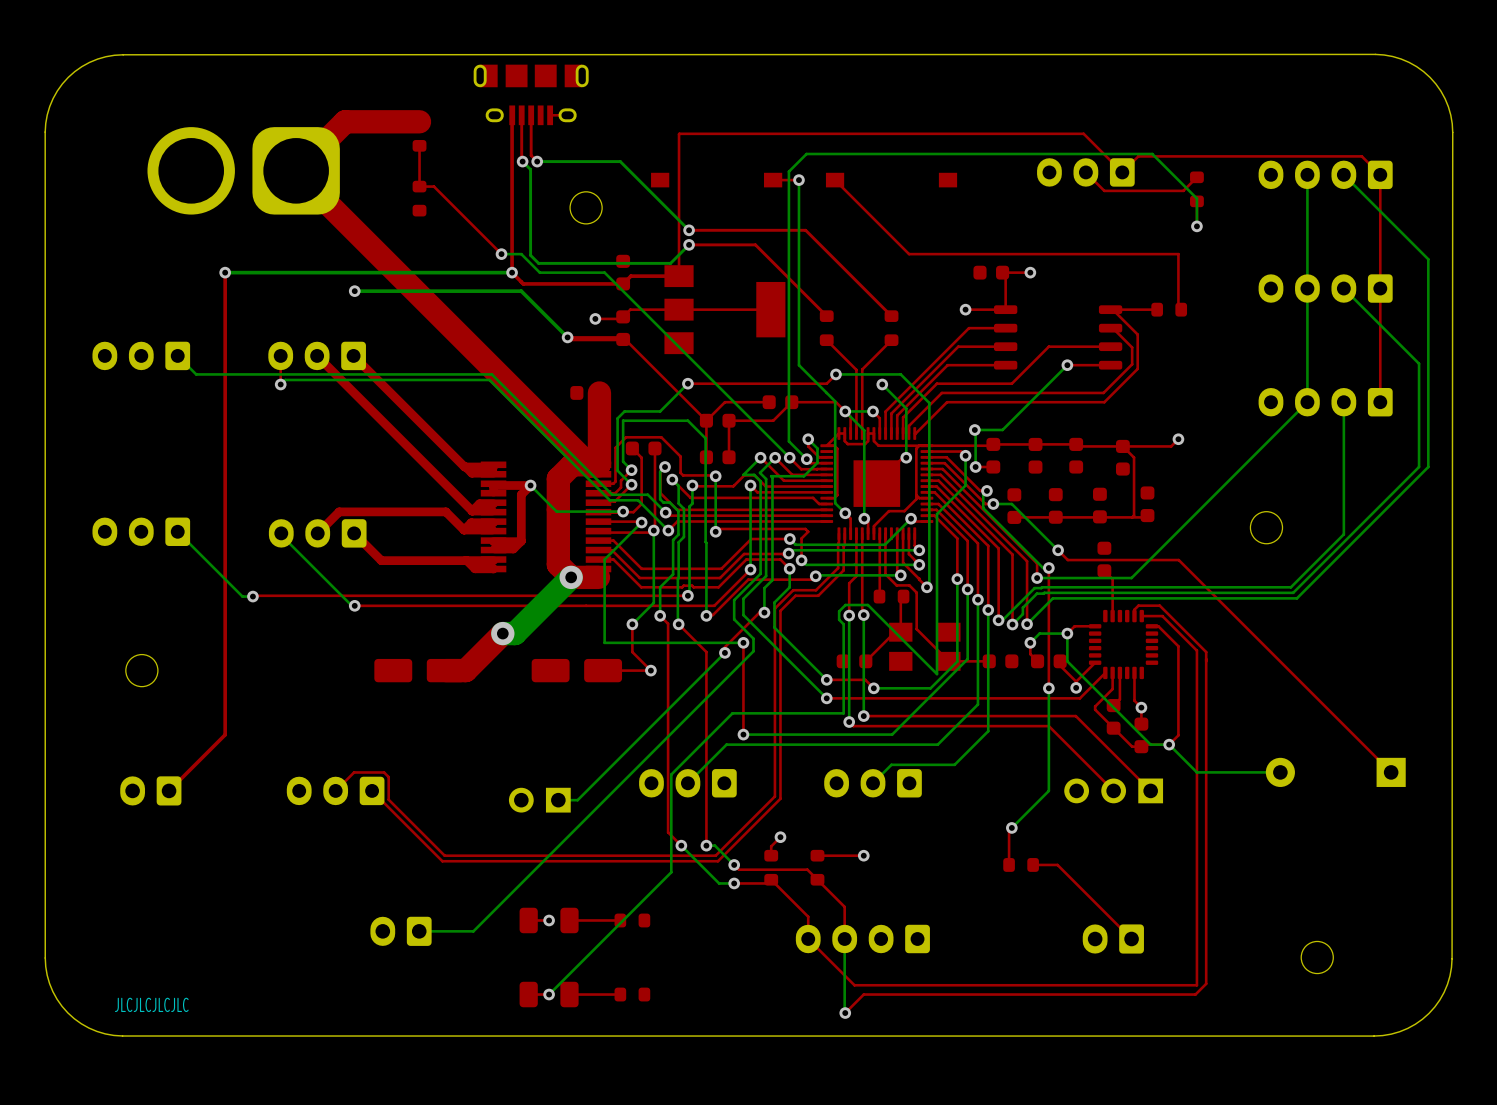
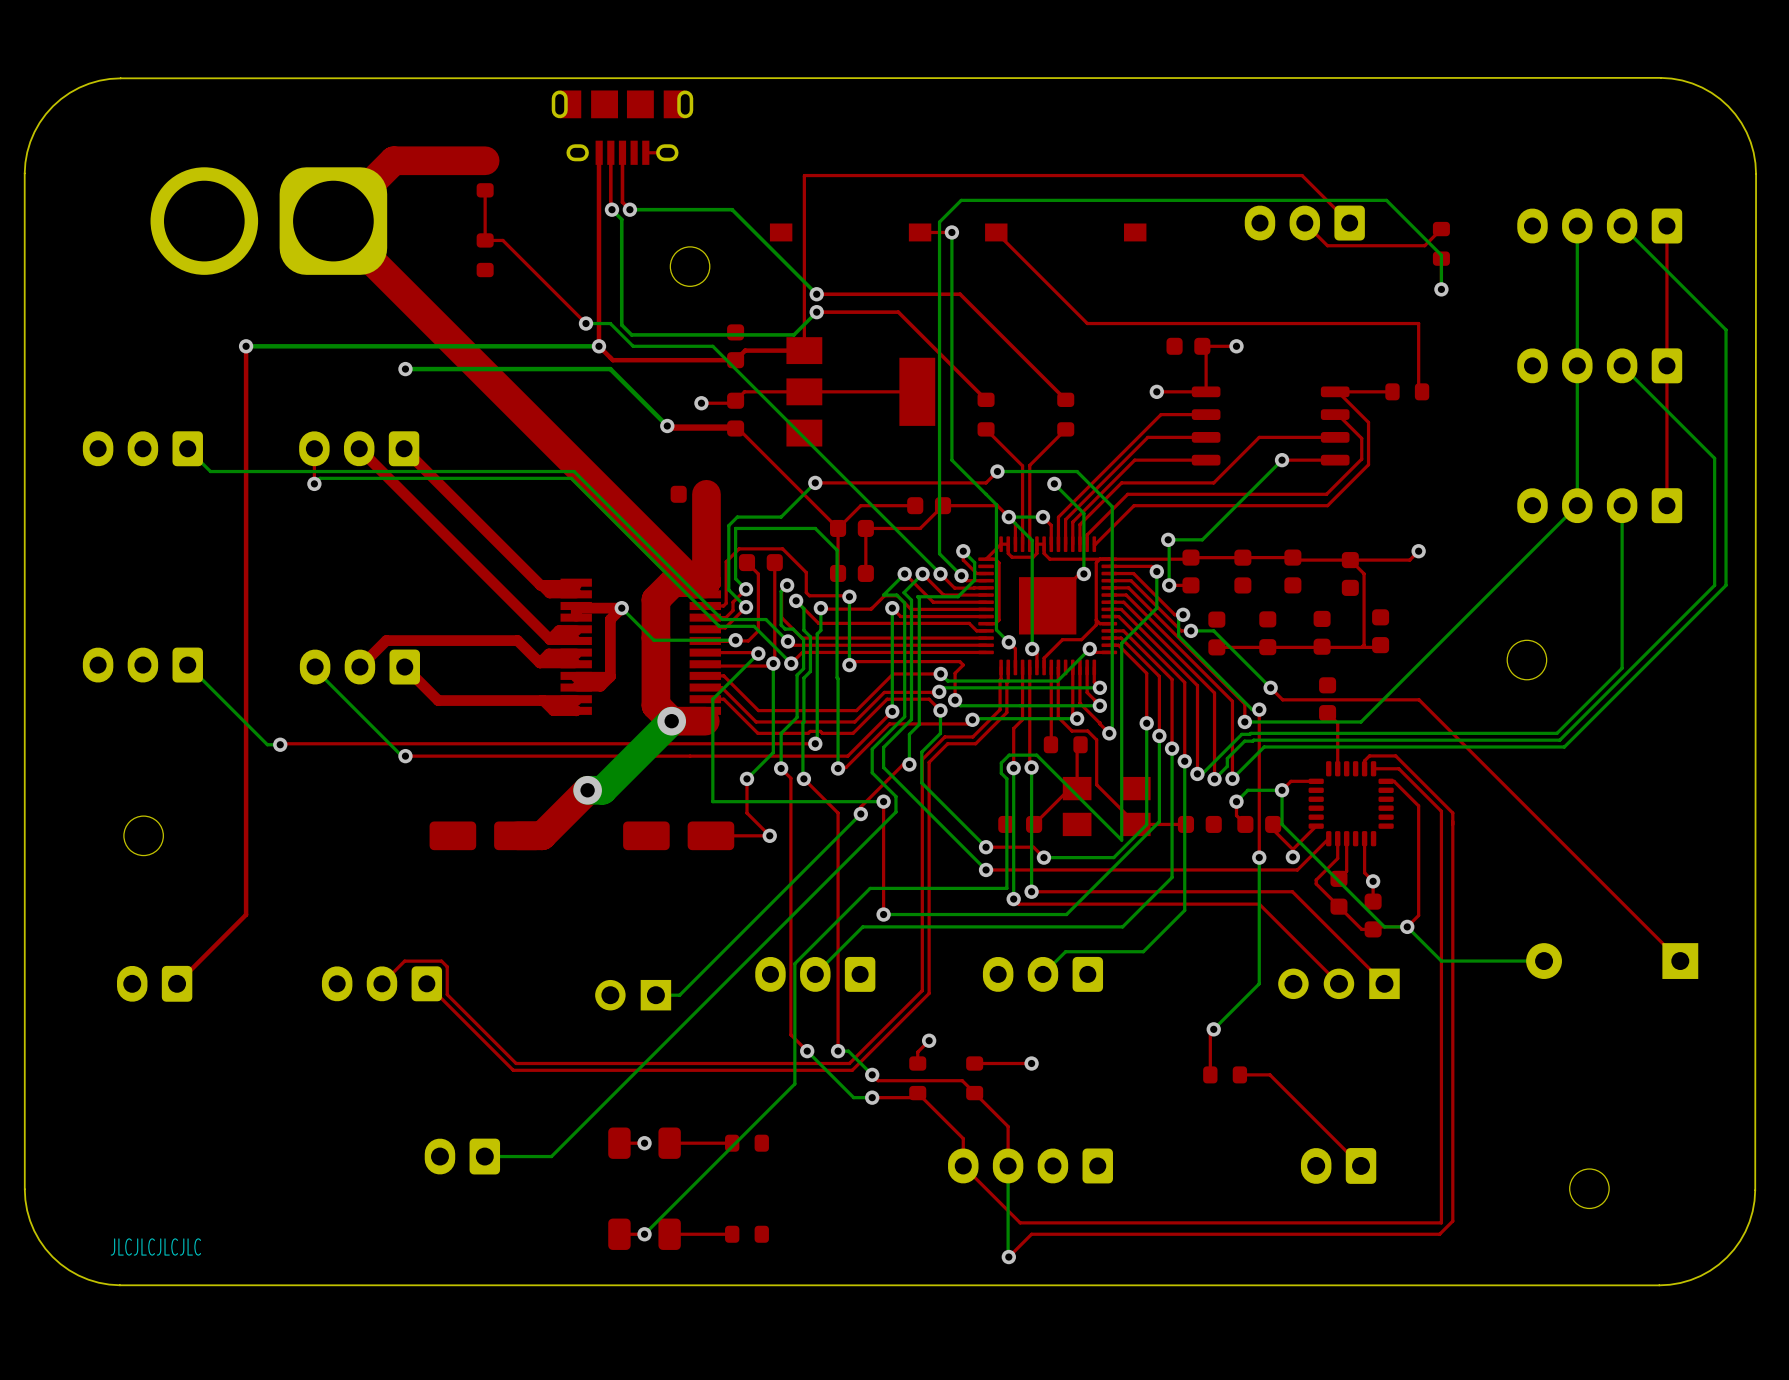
top track: (1122, 172) (1138, 156) (1361, 156) (1380, 174) -> none

